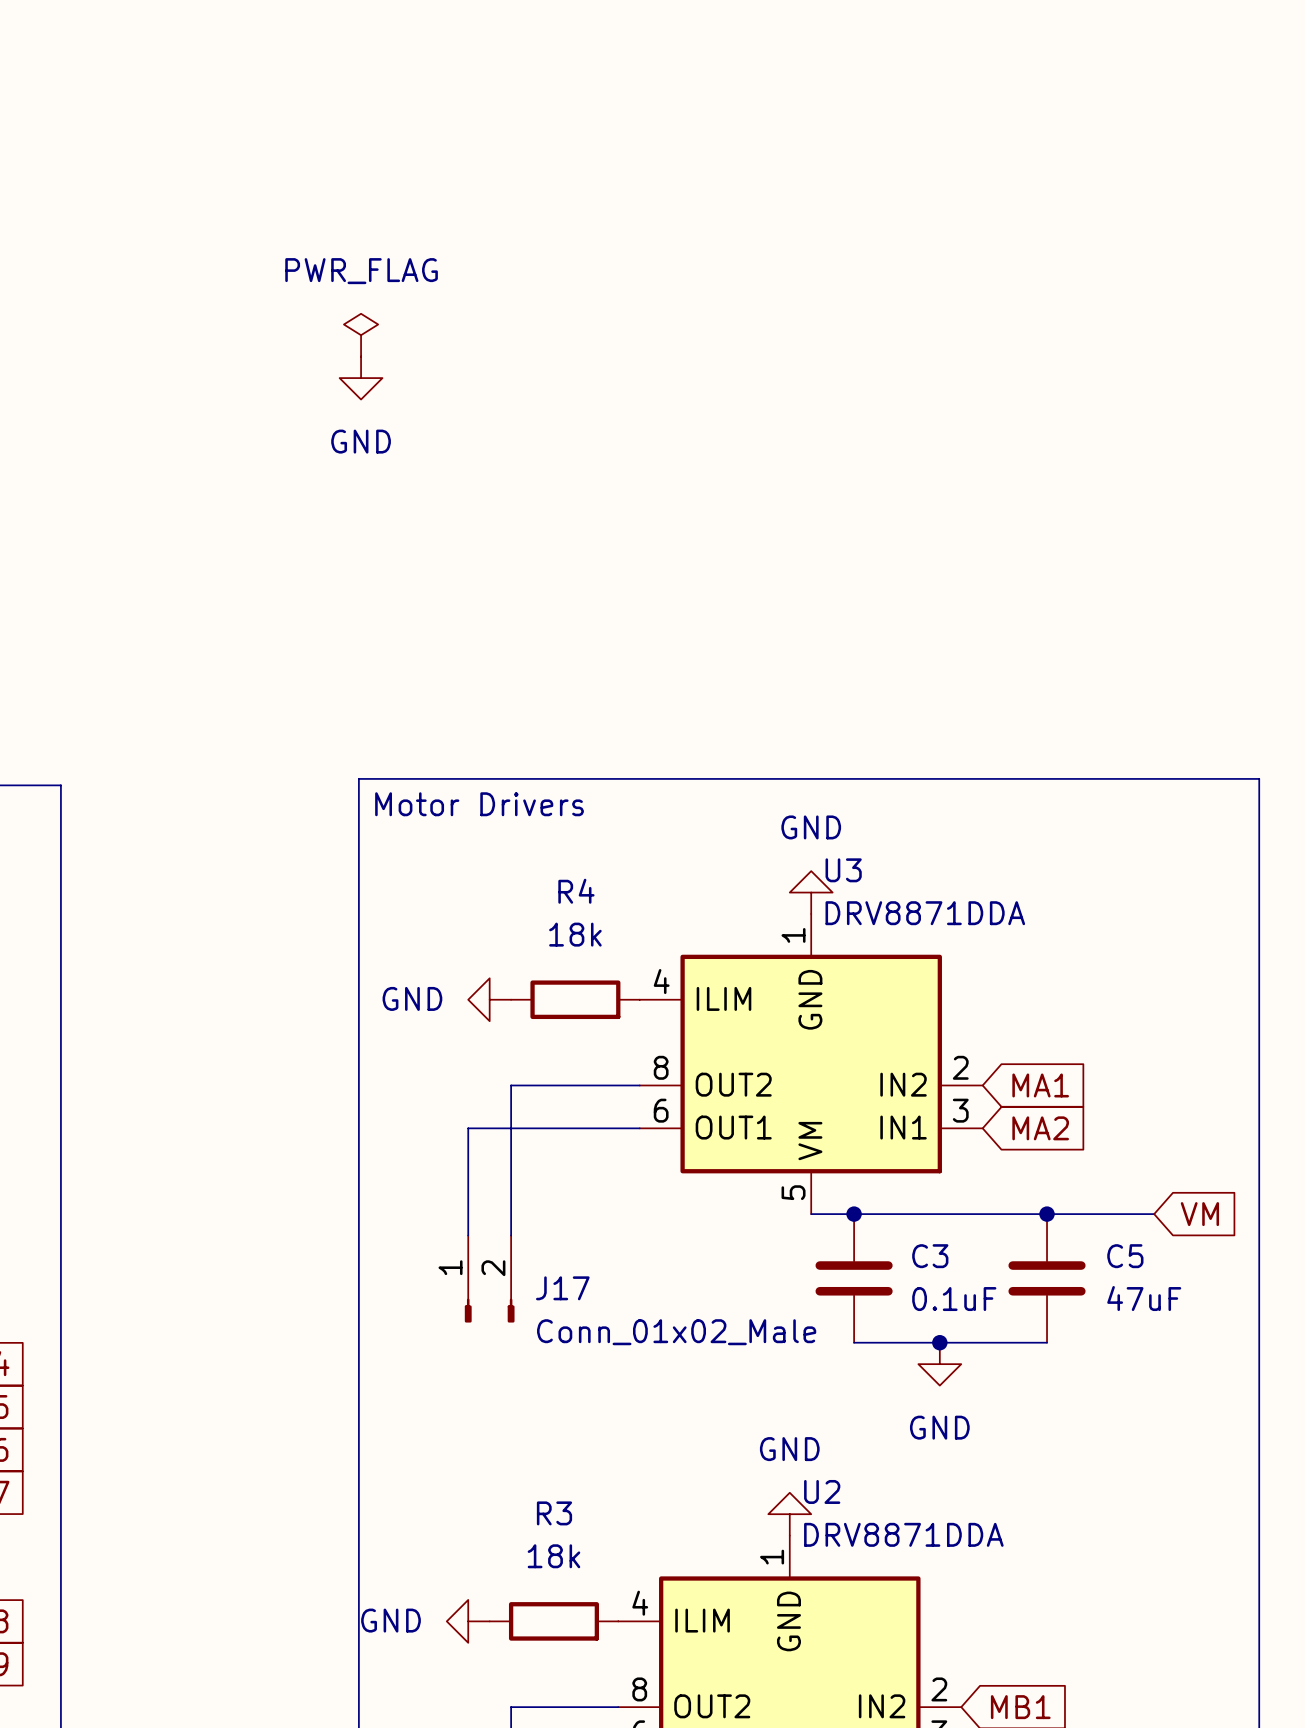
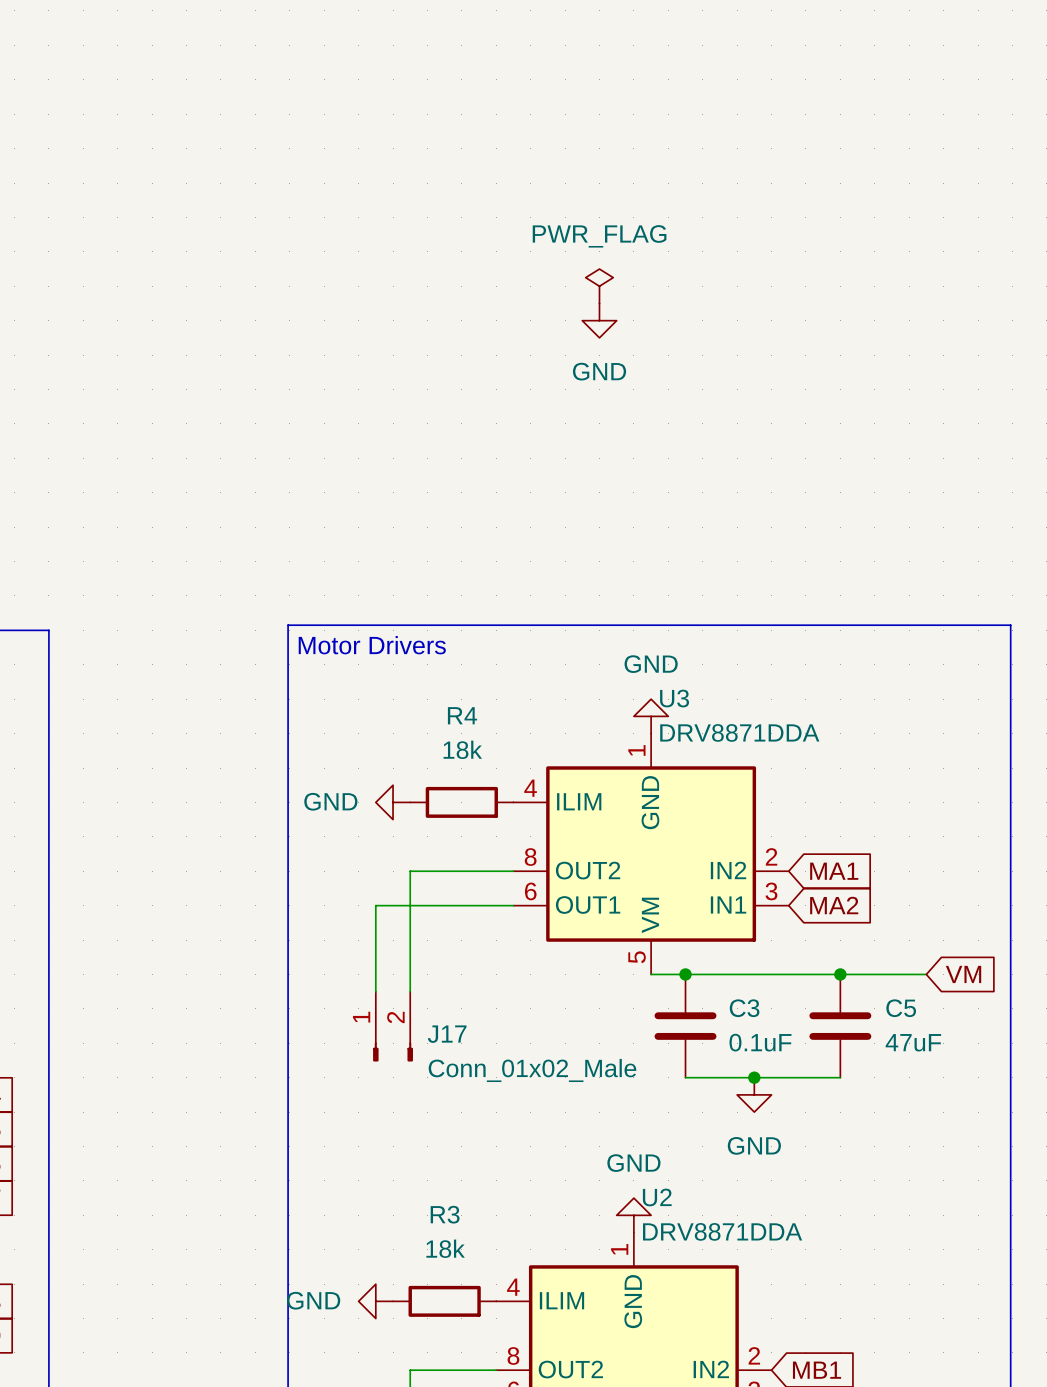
power symbol position: PWR_FLAG (361, 335) -> PWR_FLAG (599, 286)
power symbol position: GND (361, 378) -> GND (599, 320)

